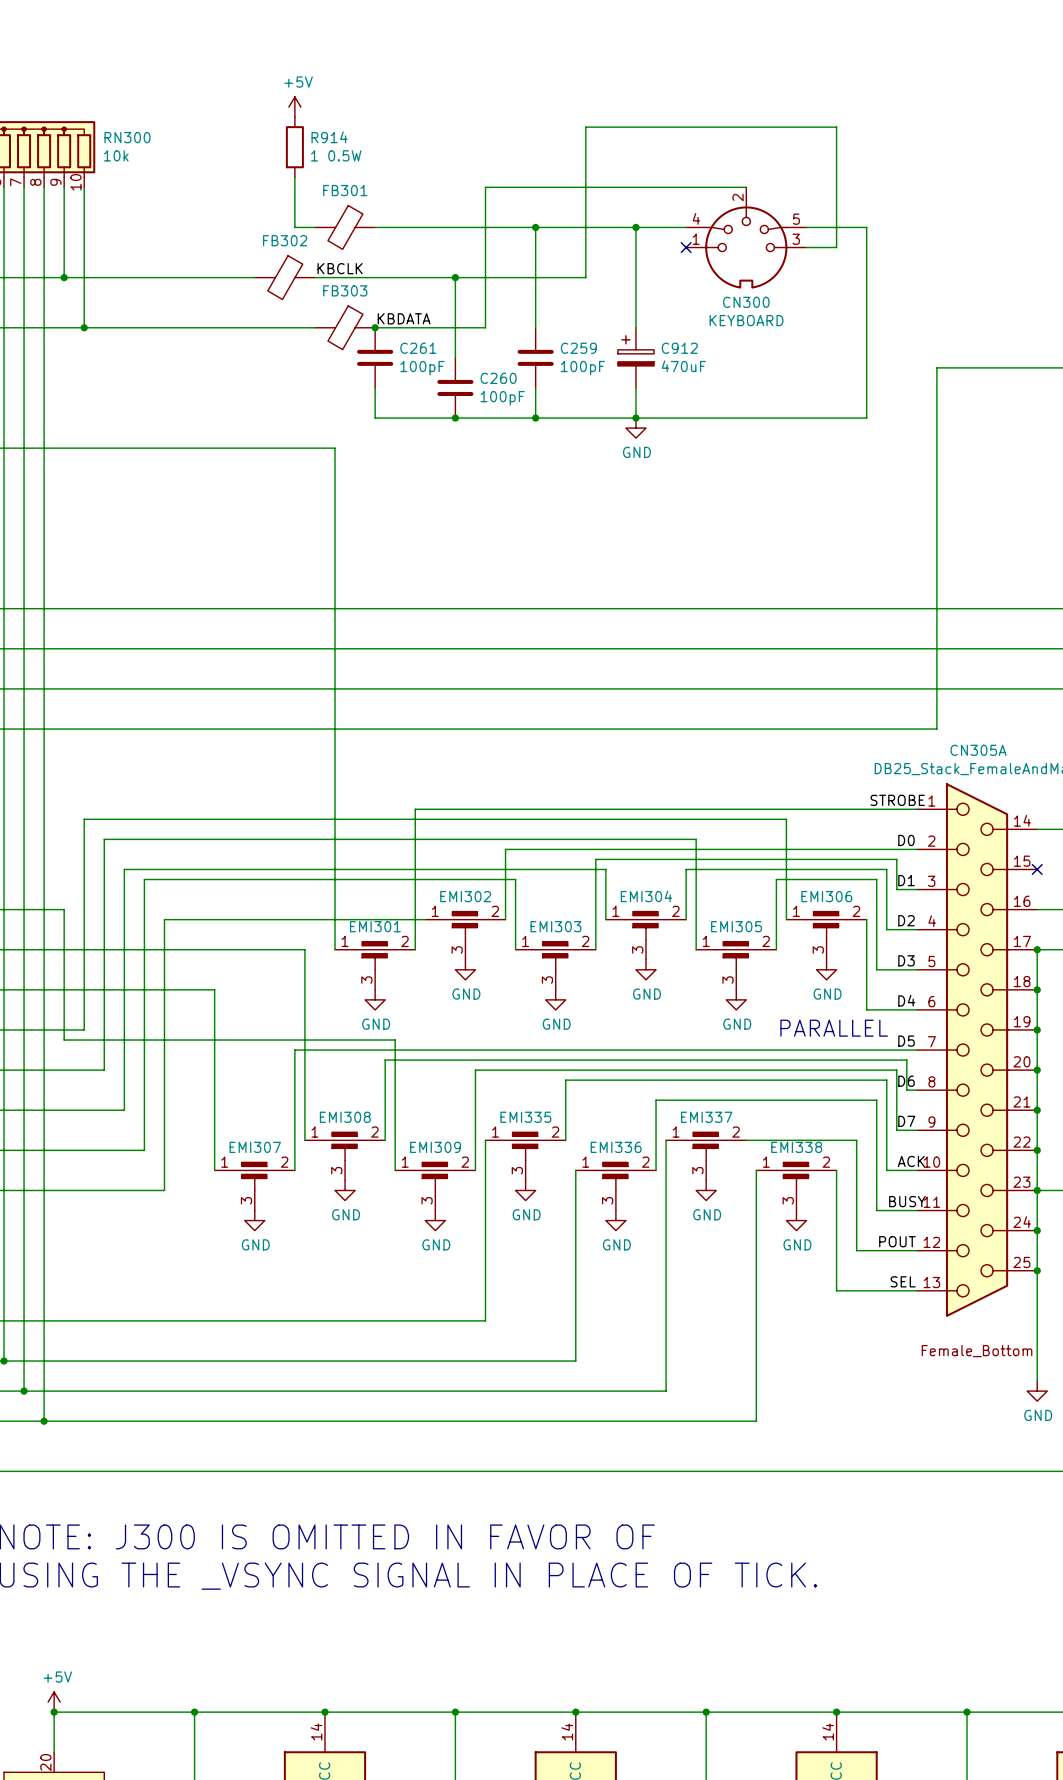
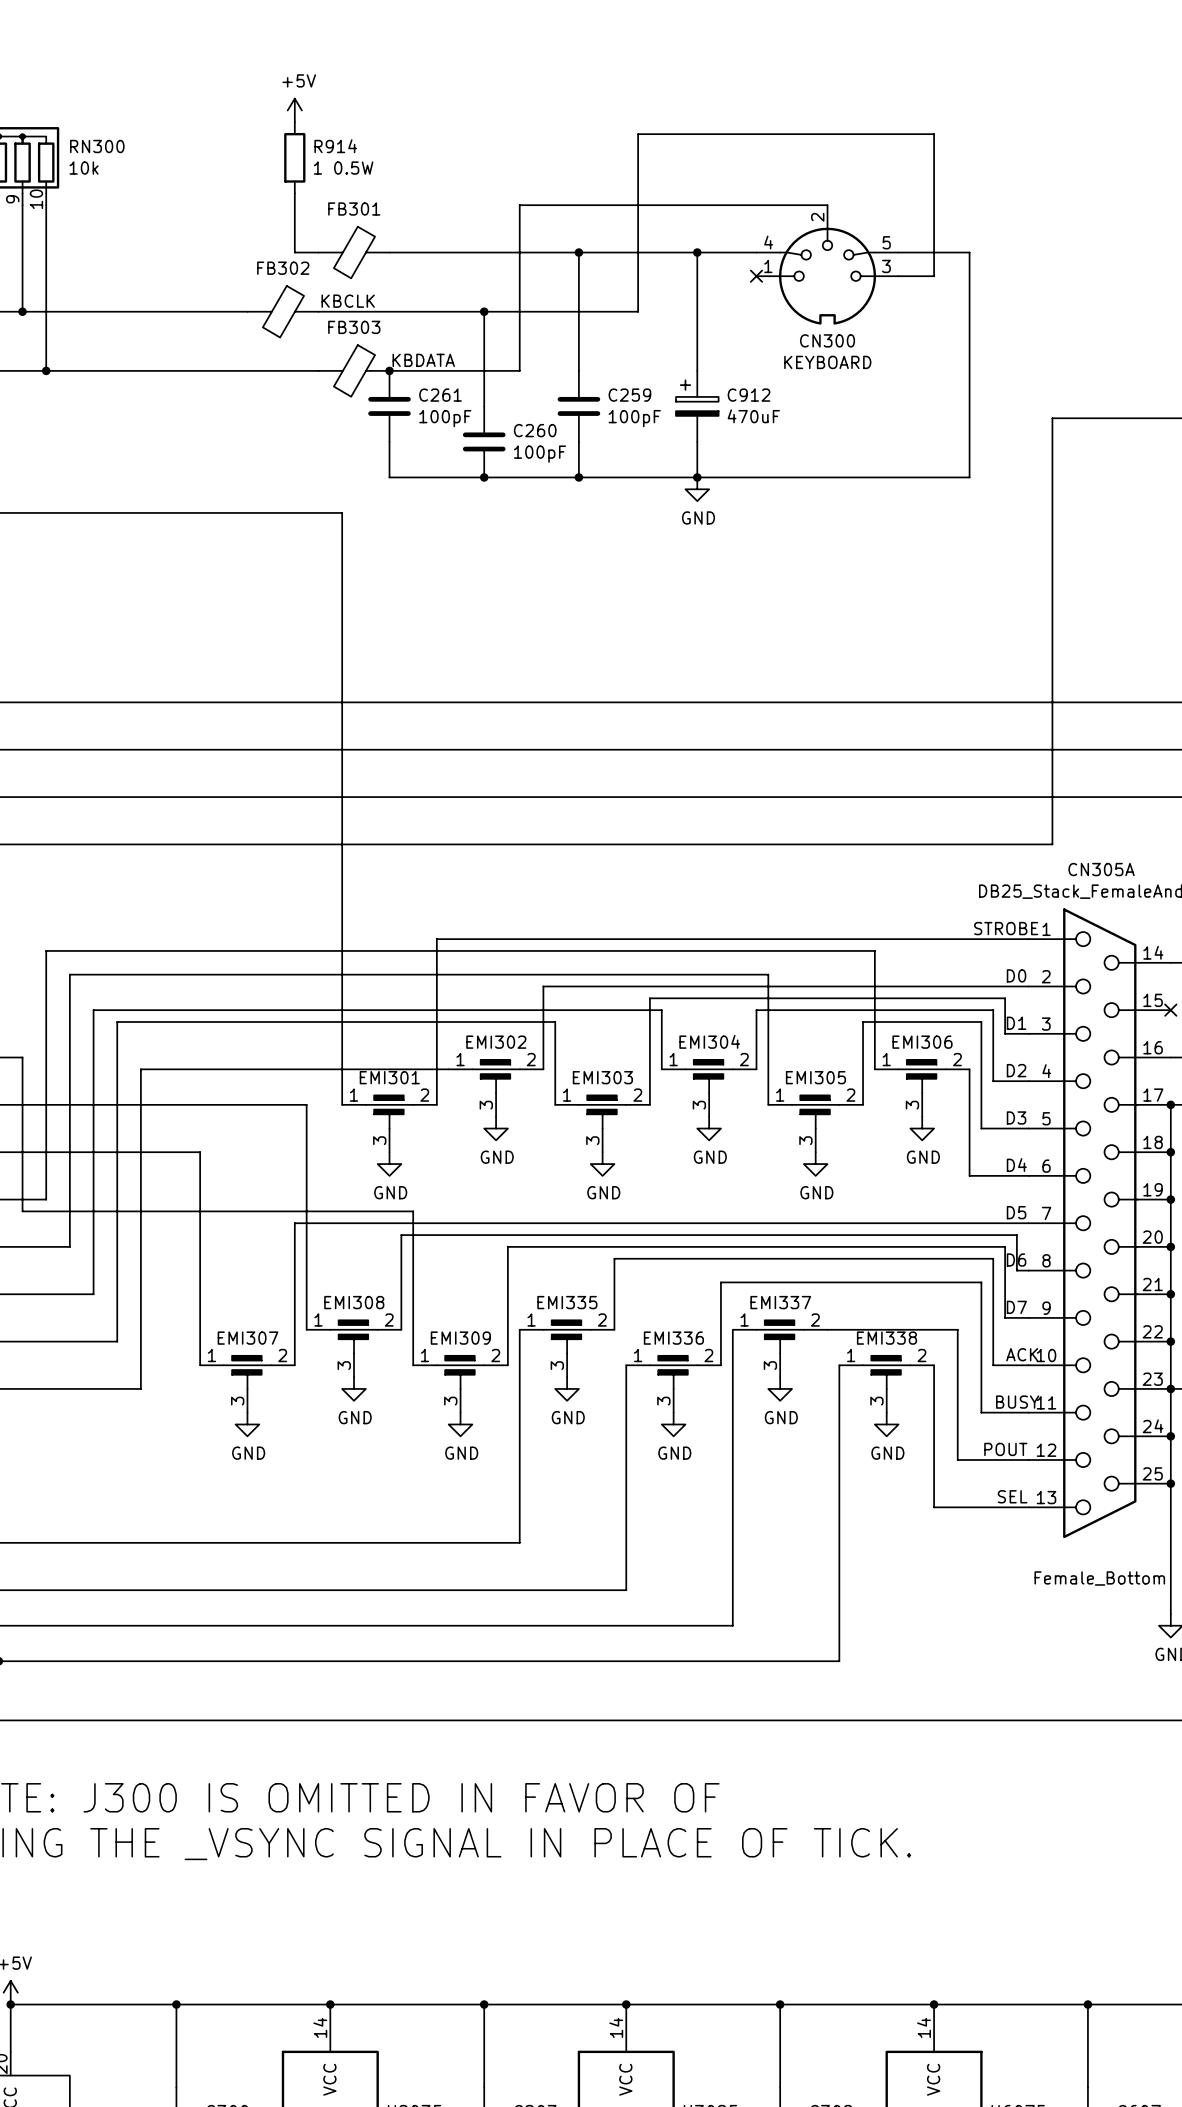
text: PARALLEL (834, 1028) -> none

